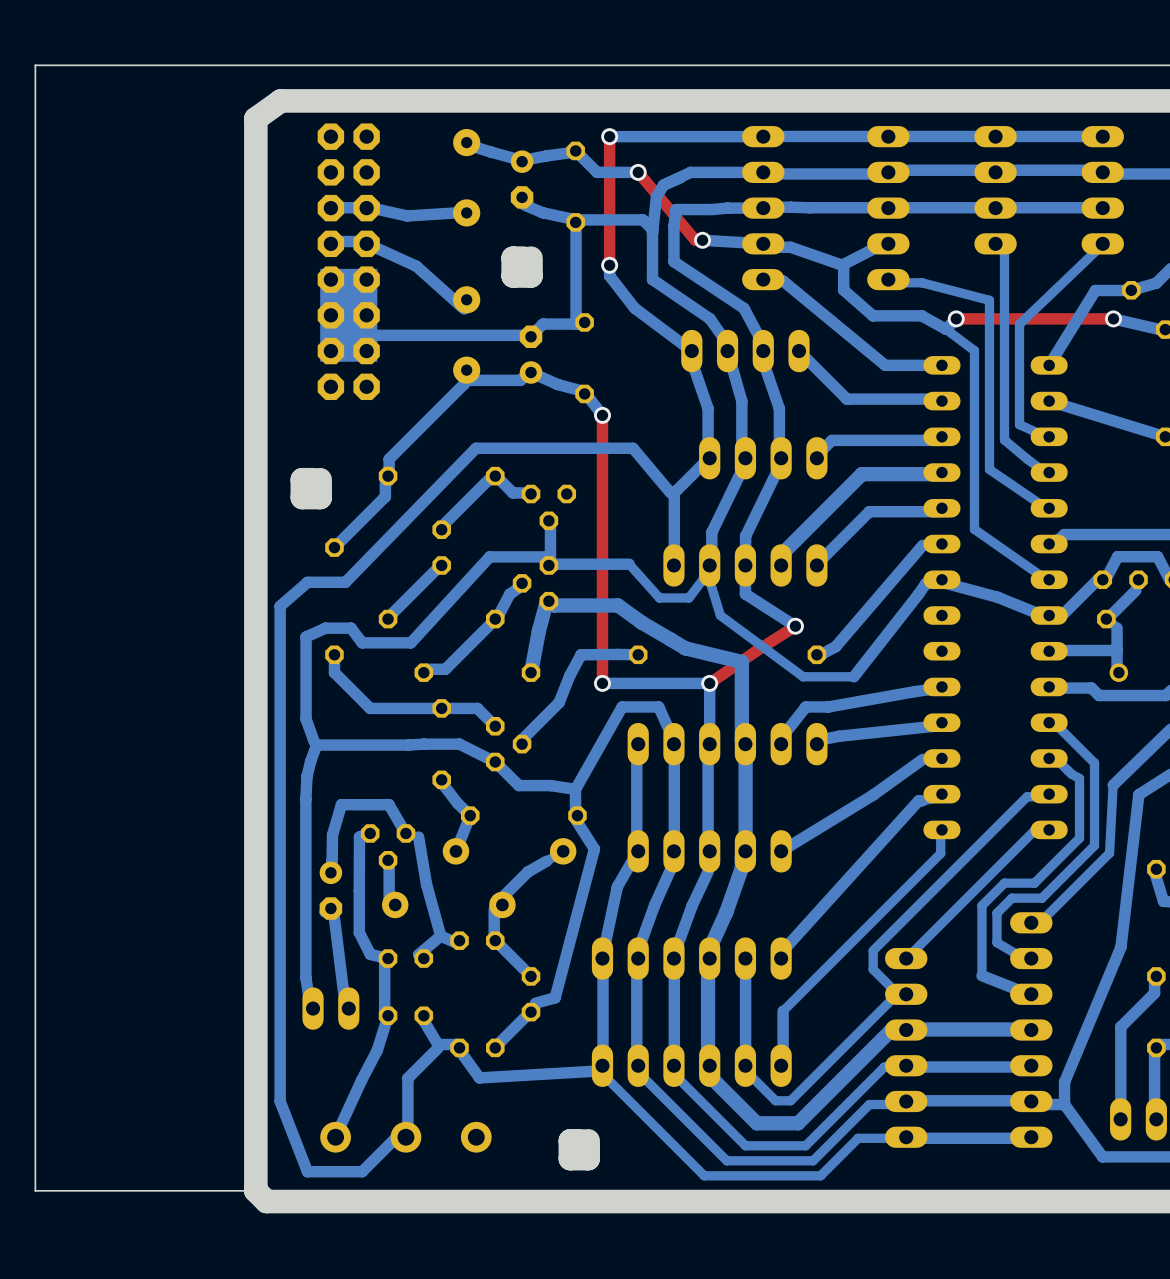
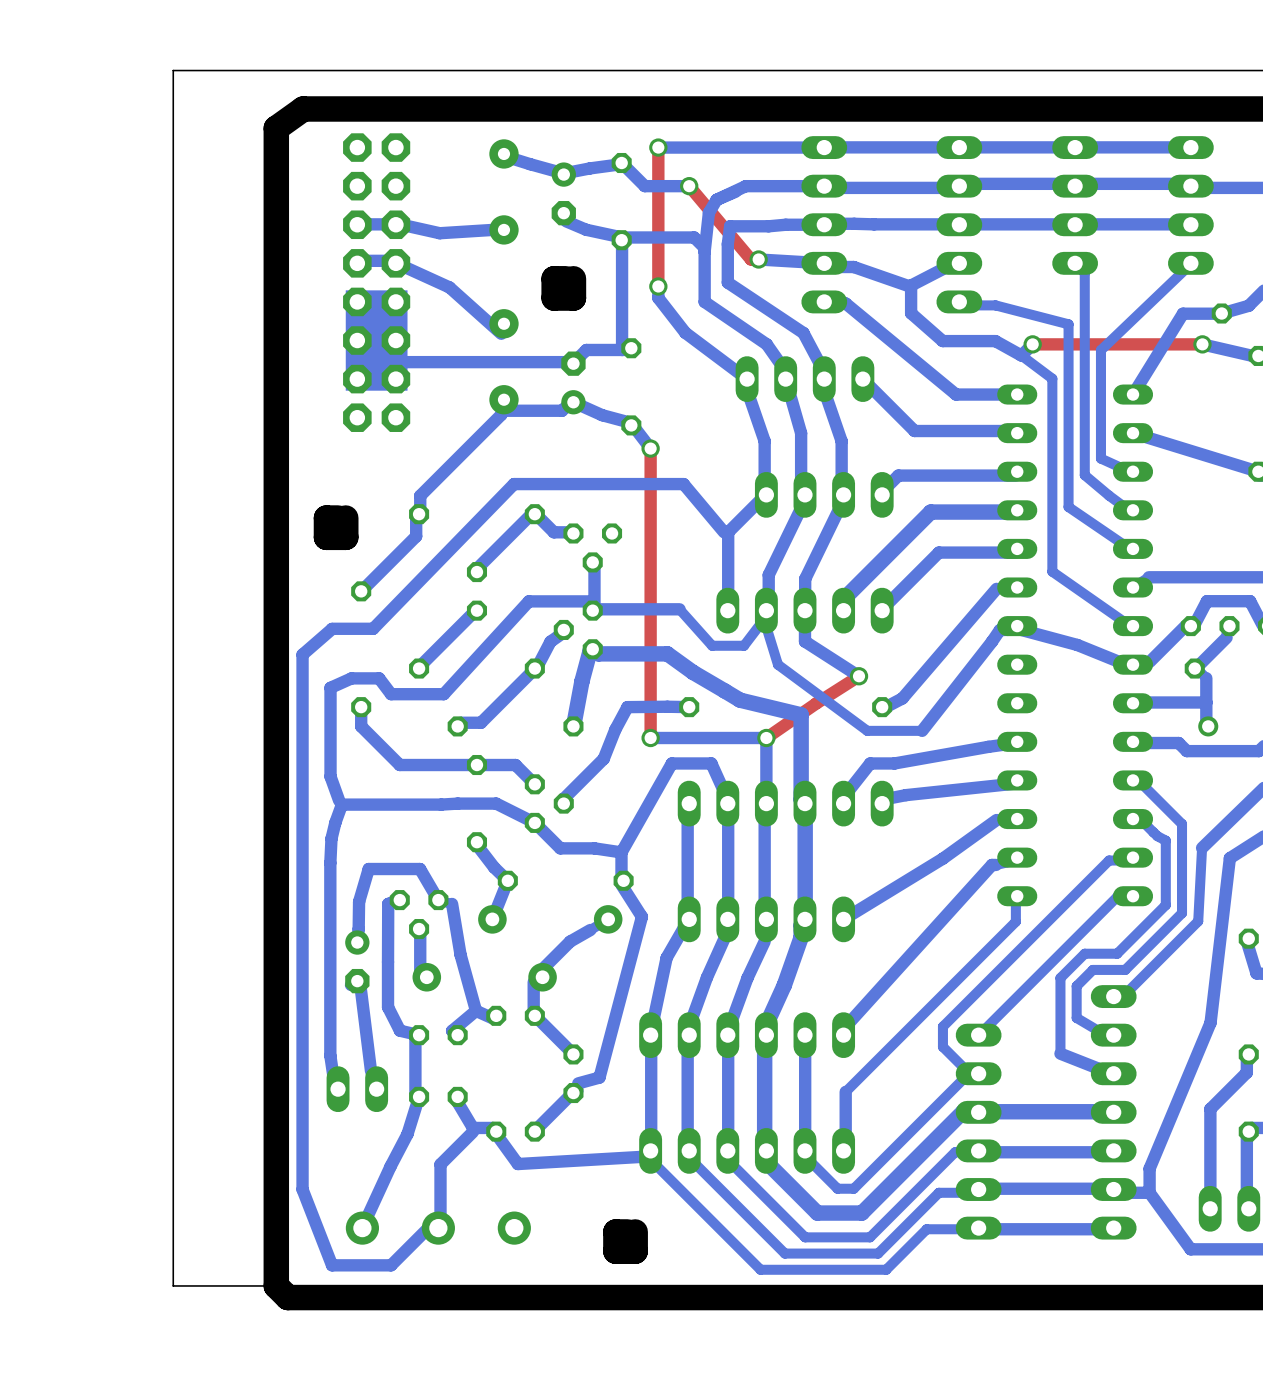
board edge: (160, 65) (35, 65) (35, 1190) (160, 1190) -> (173, 70) (173, 1285)

